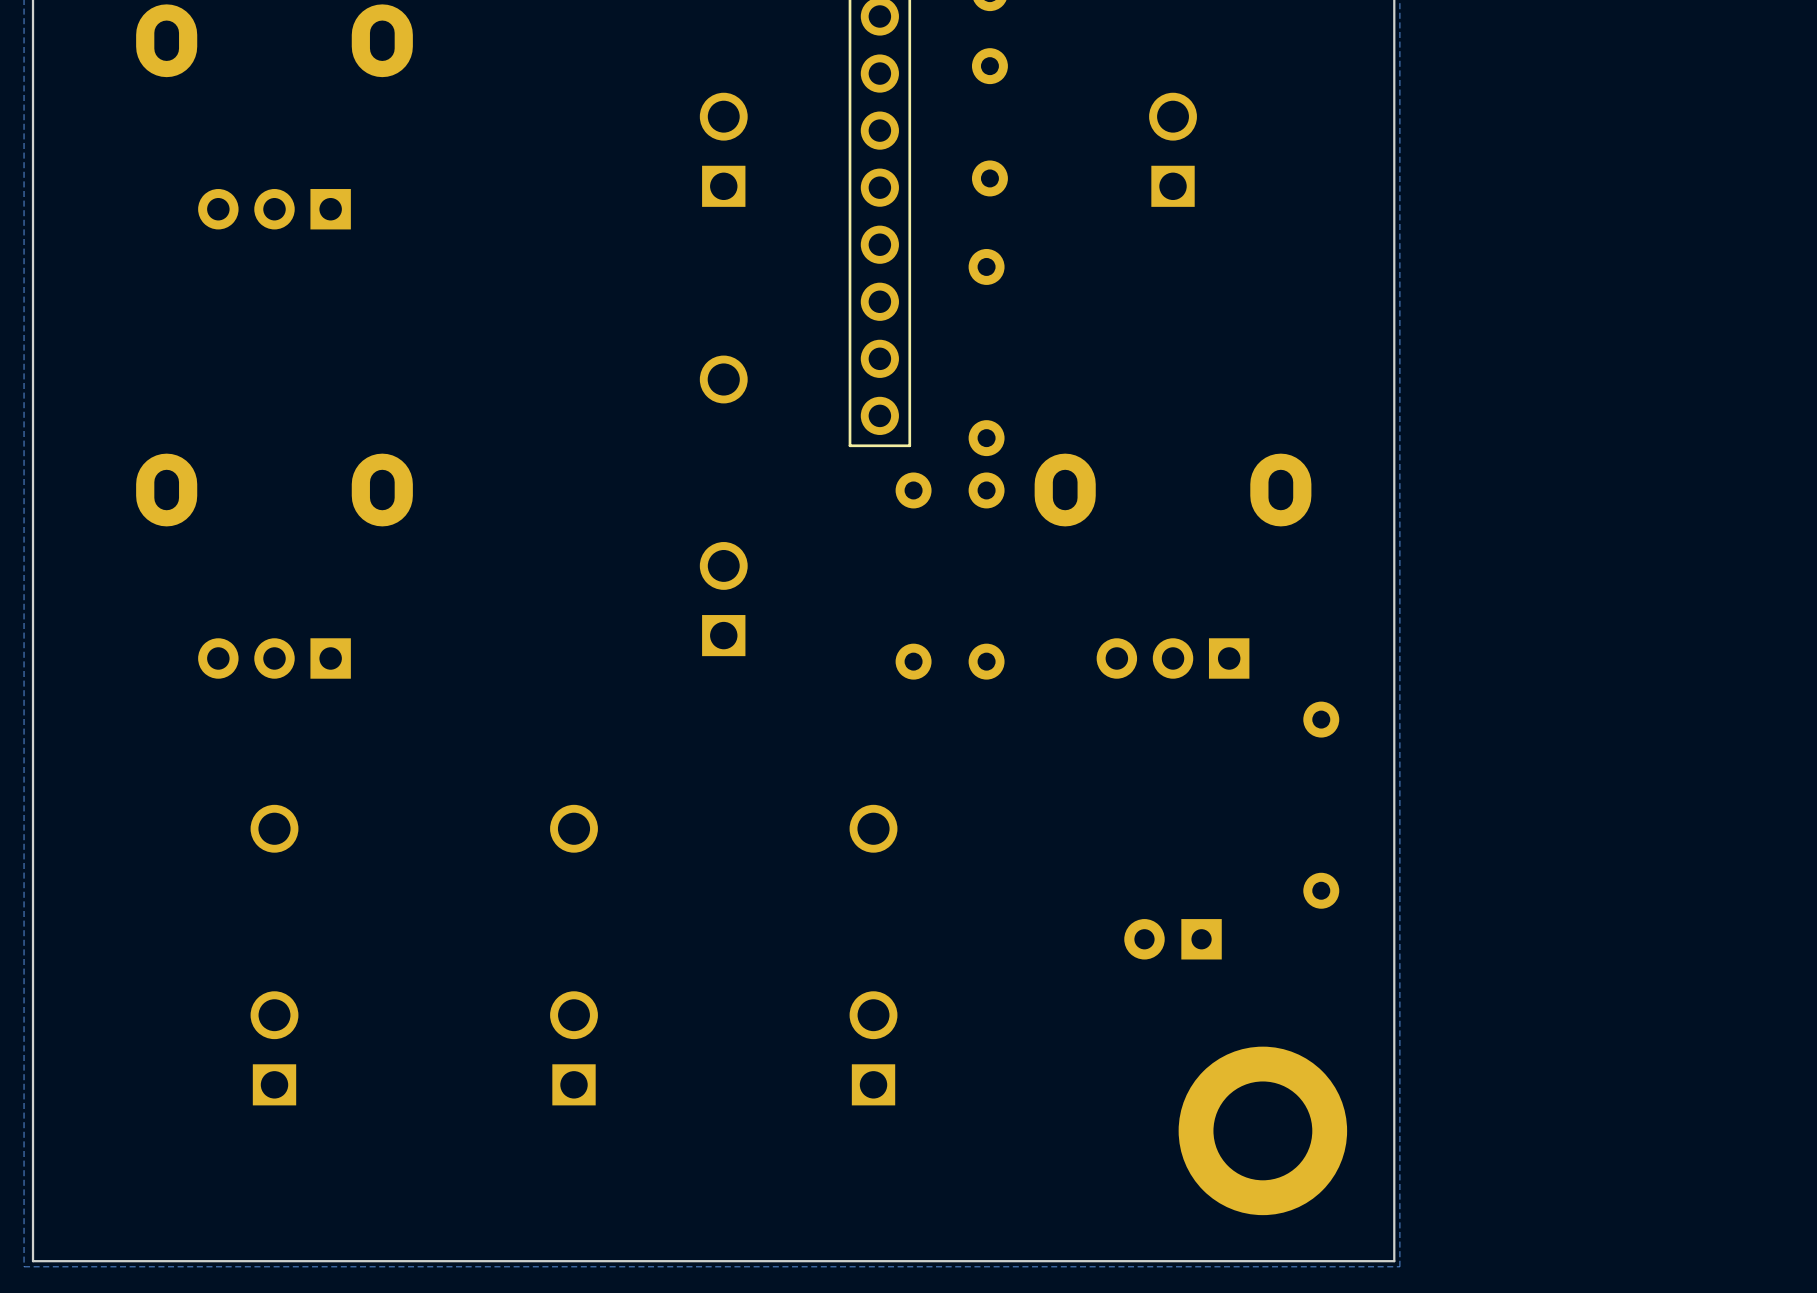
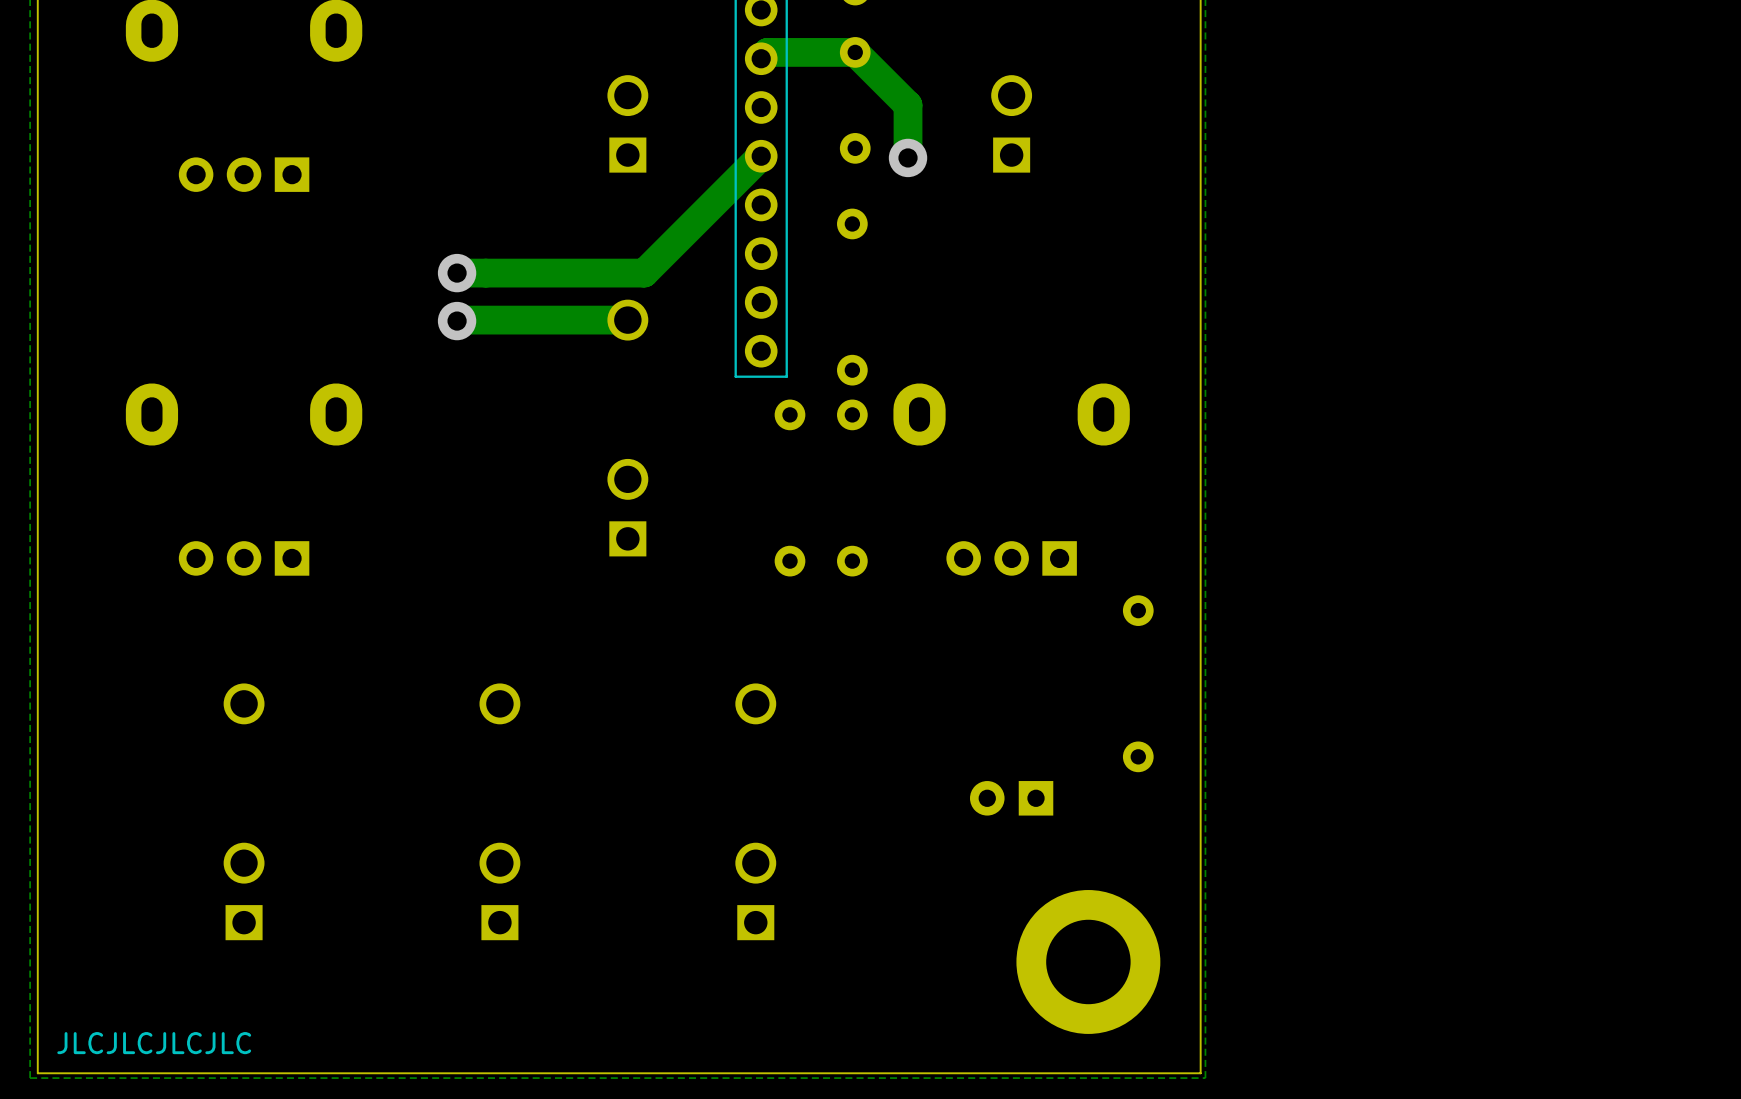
track: none -> (761, 58) (767, 52) (855, 52) (908, 105) (908, 157)
track: none -> (761, 156) (644, 273) (457, 273)
via: none -> (908, 157)
via: none -> (457, 273)
track: none -> (627, 320) (457, 321)
via: none -> (457, 321)
text: none -> JLCJLCJLCJLC (154, 1043)

